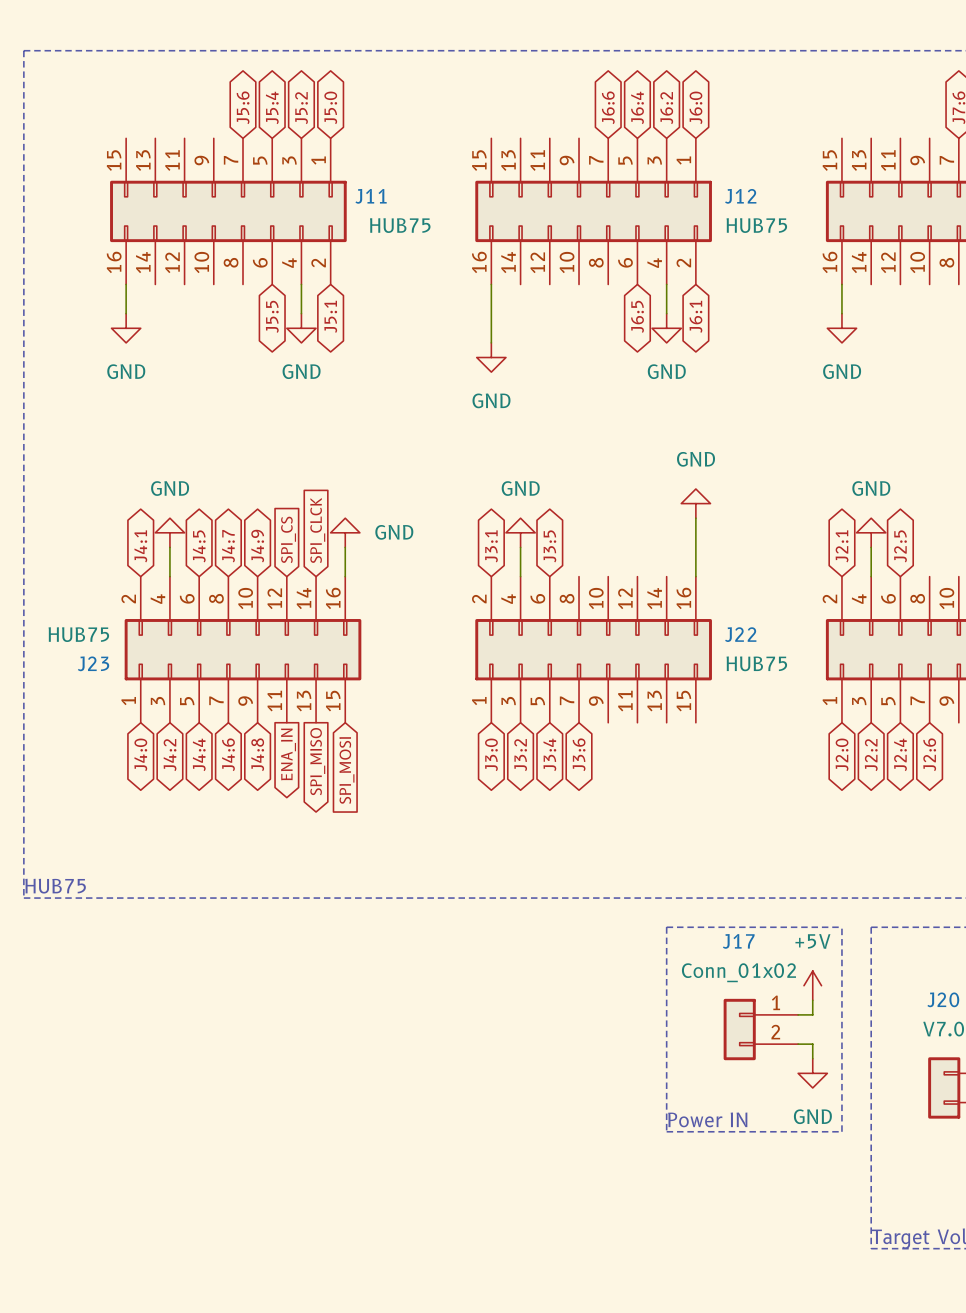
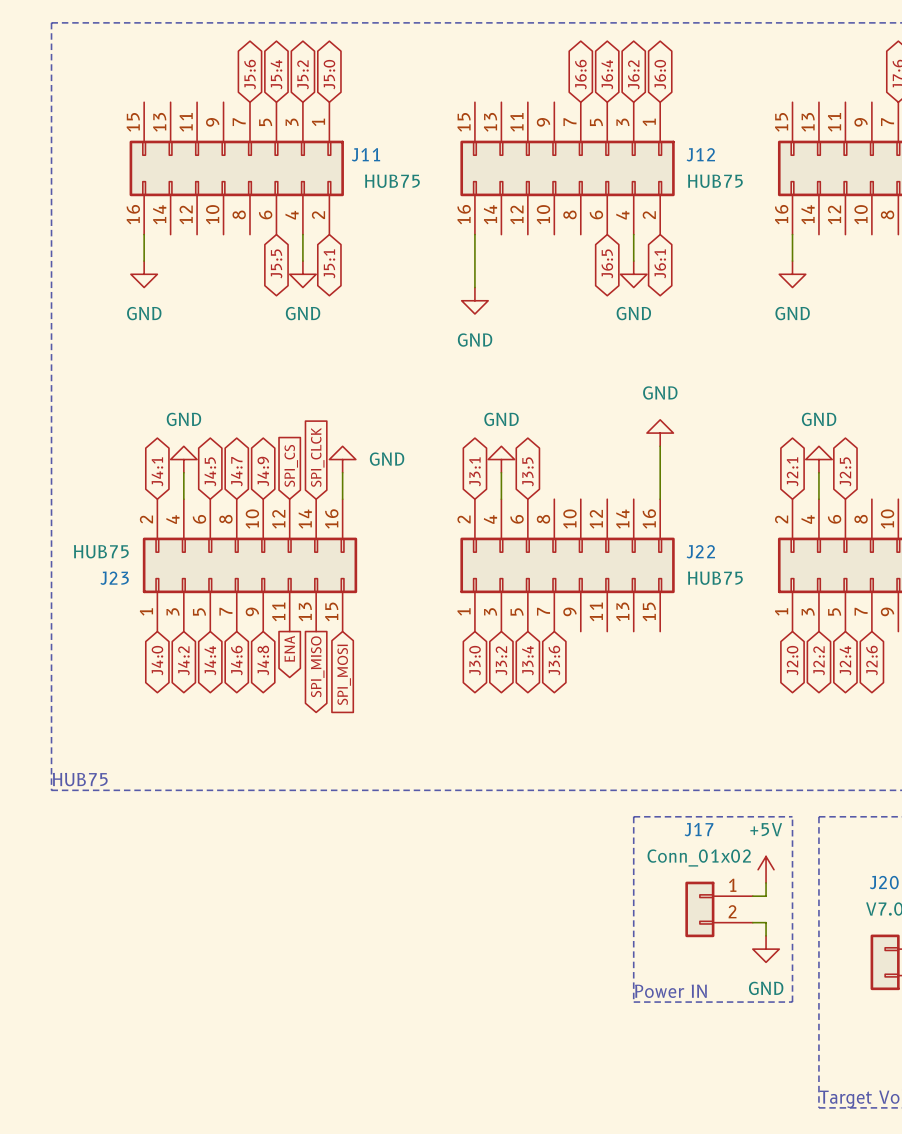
global label: ENA_IN (288, 754) -> ENA (289, 648)

